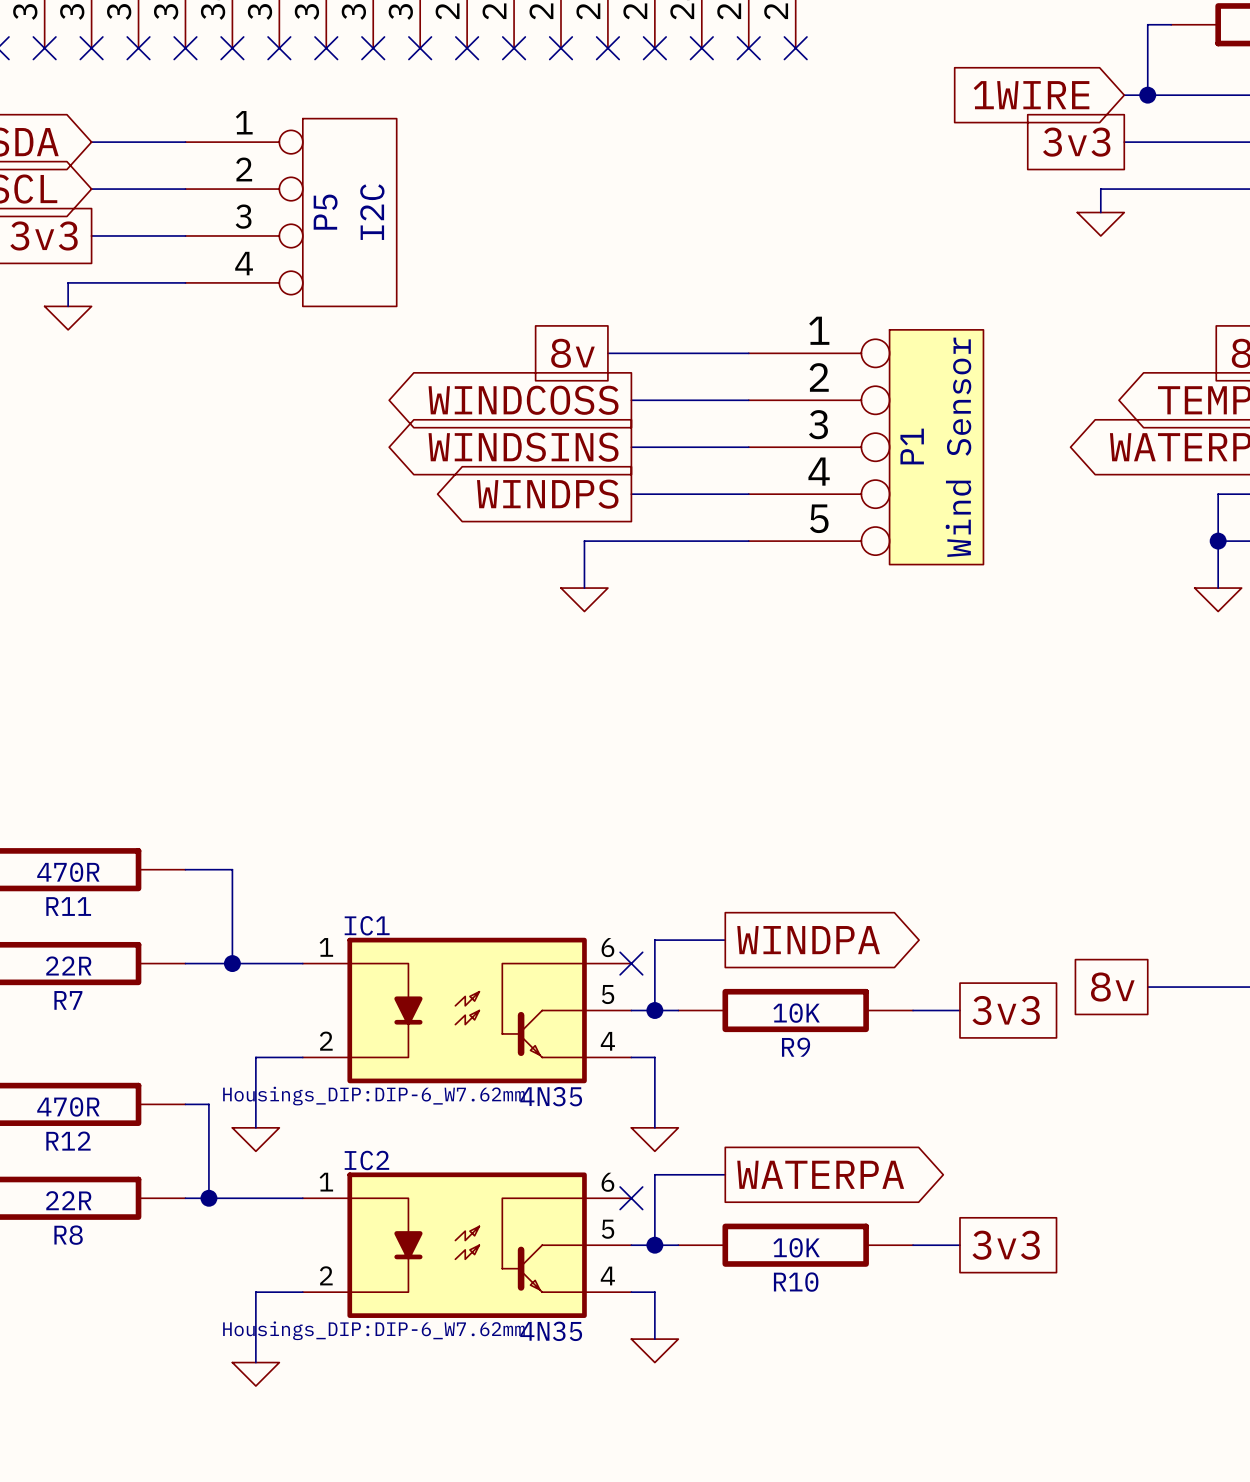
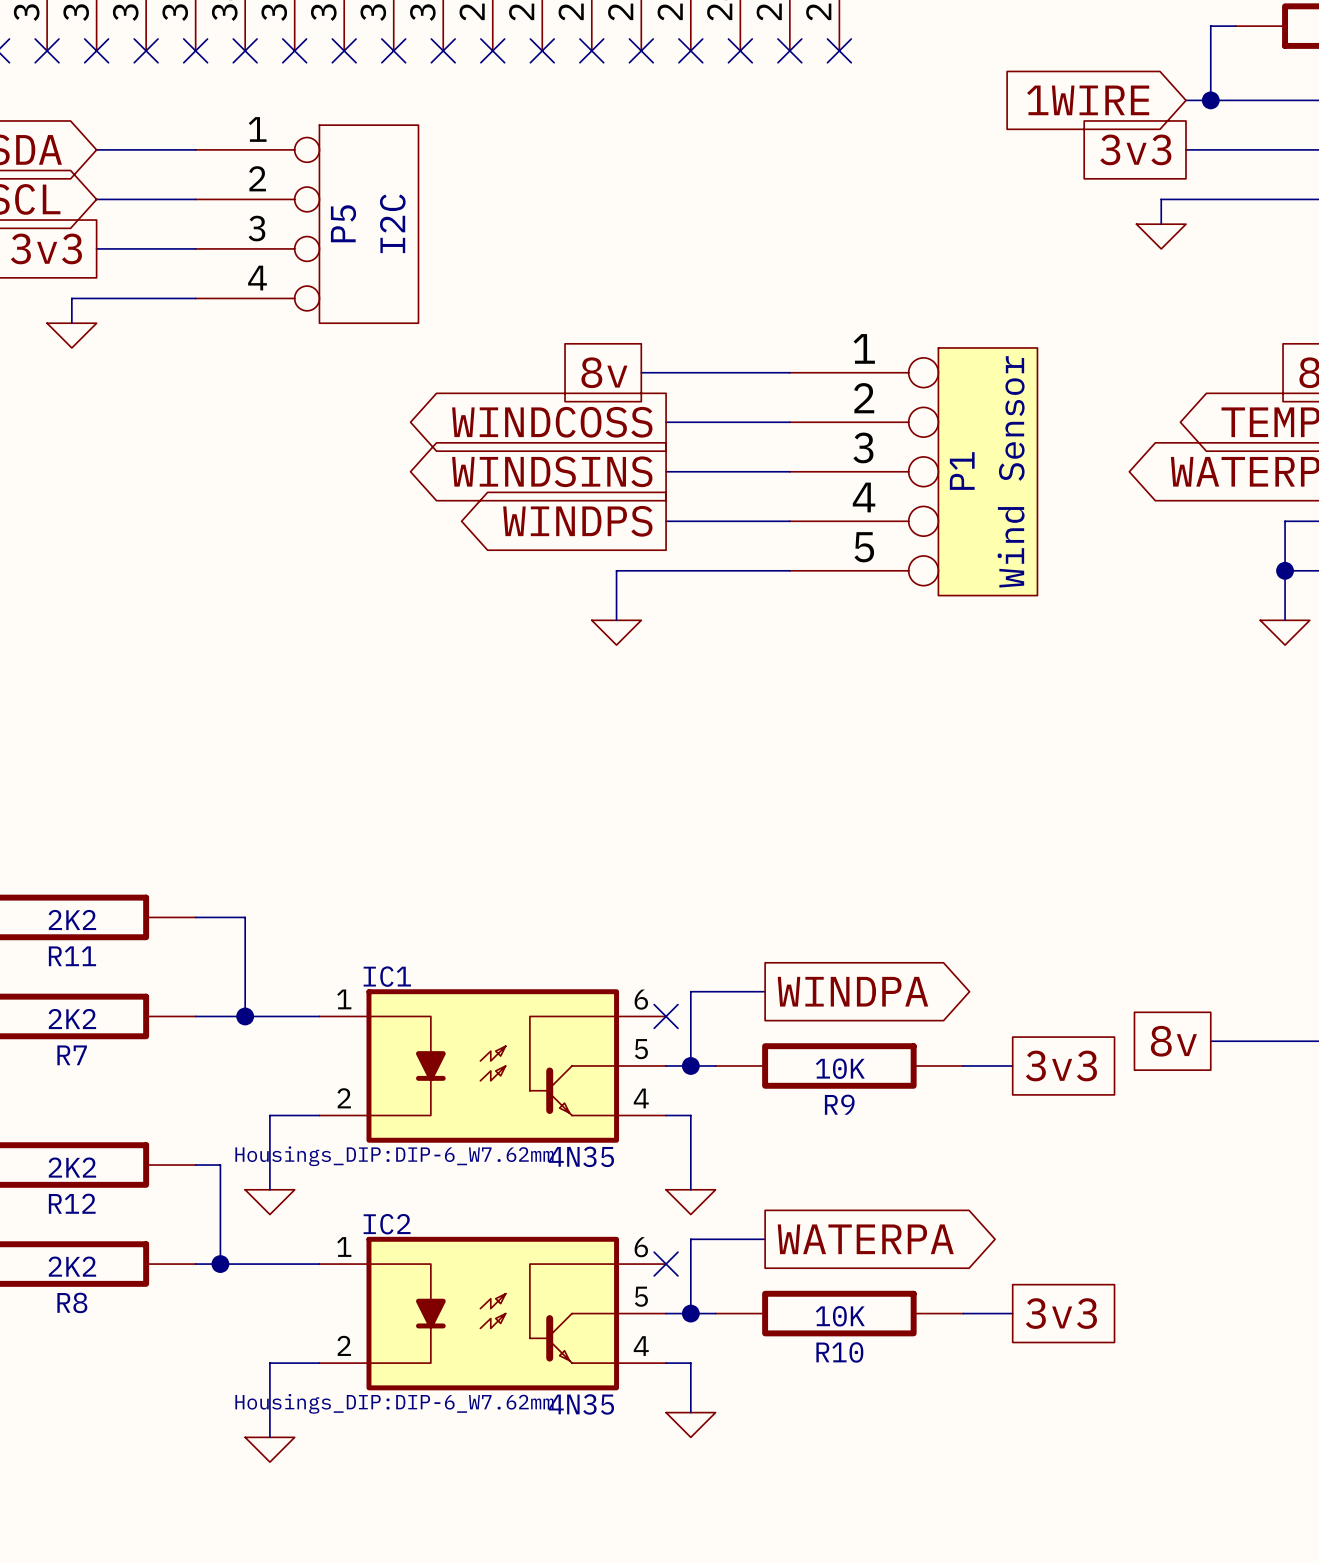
R11 value: 470R (68, 872) -> 2K2 (72, 919)
R7 value: 22R (68, 965) -> 2K2 (72, 1019)
R12 value: 470R (68, 1106) -> 2K2 (72, 1167)
R8 value: 22R (68, 1200) -> 2K2 (72, 1266)

